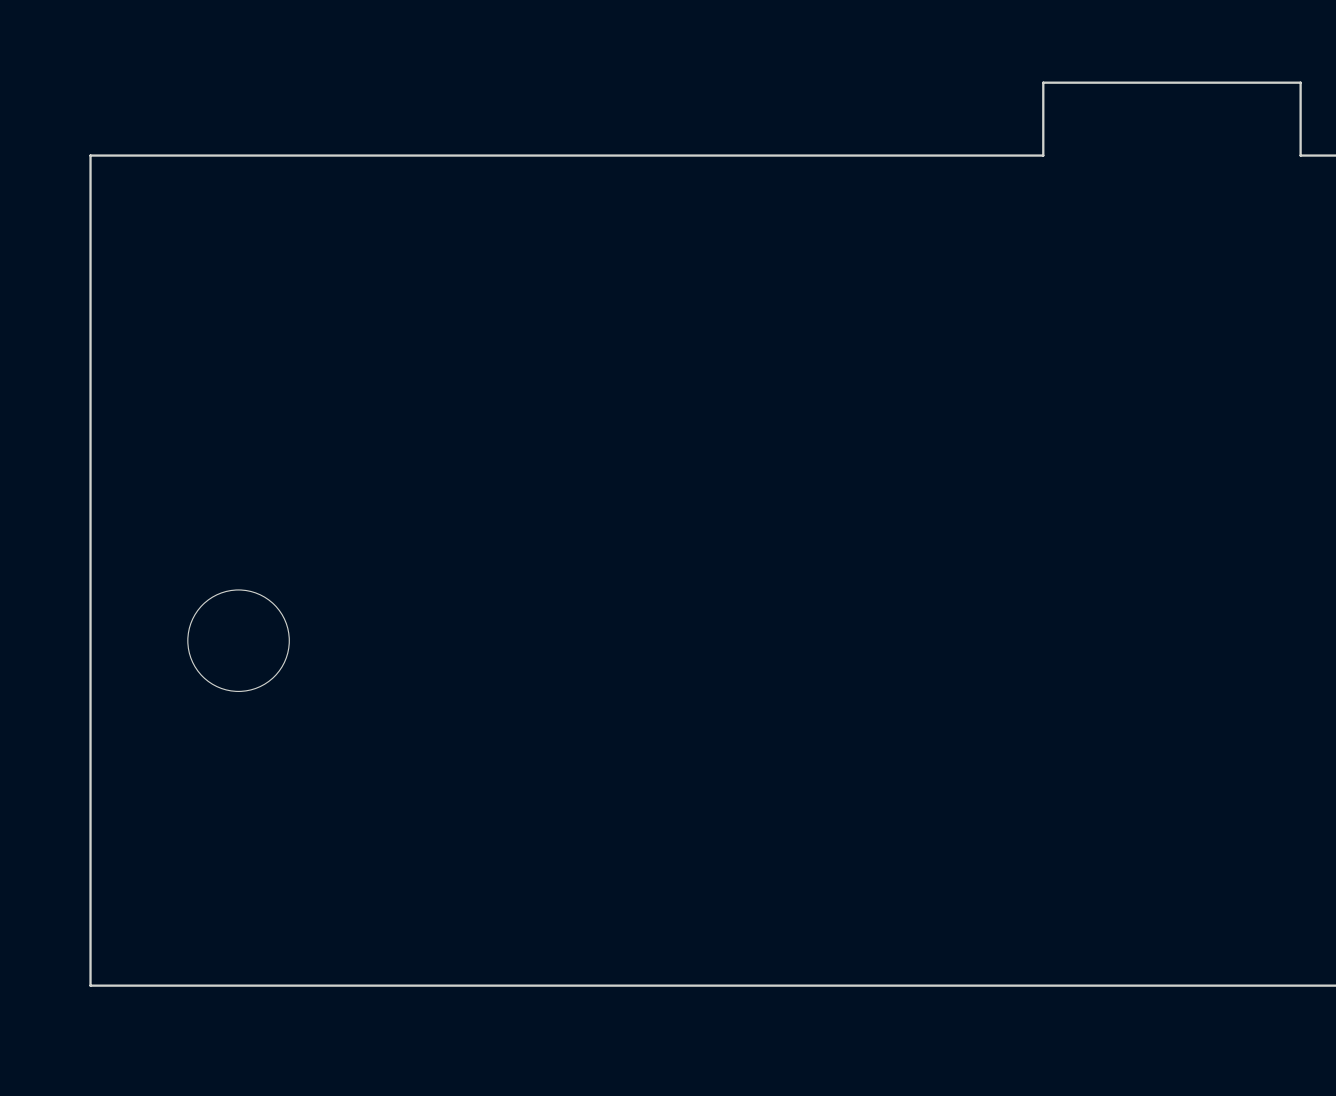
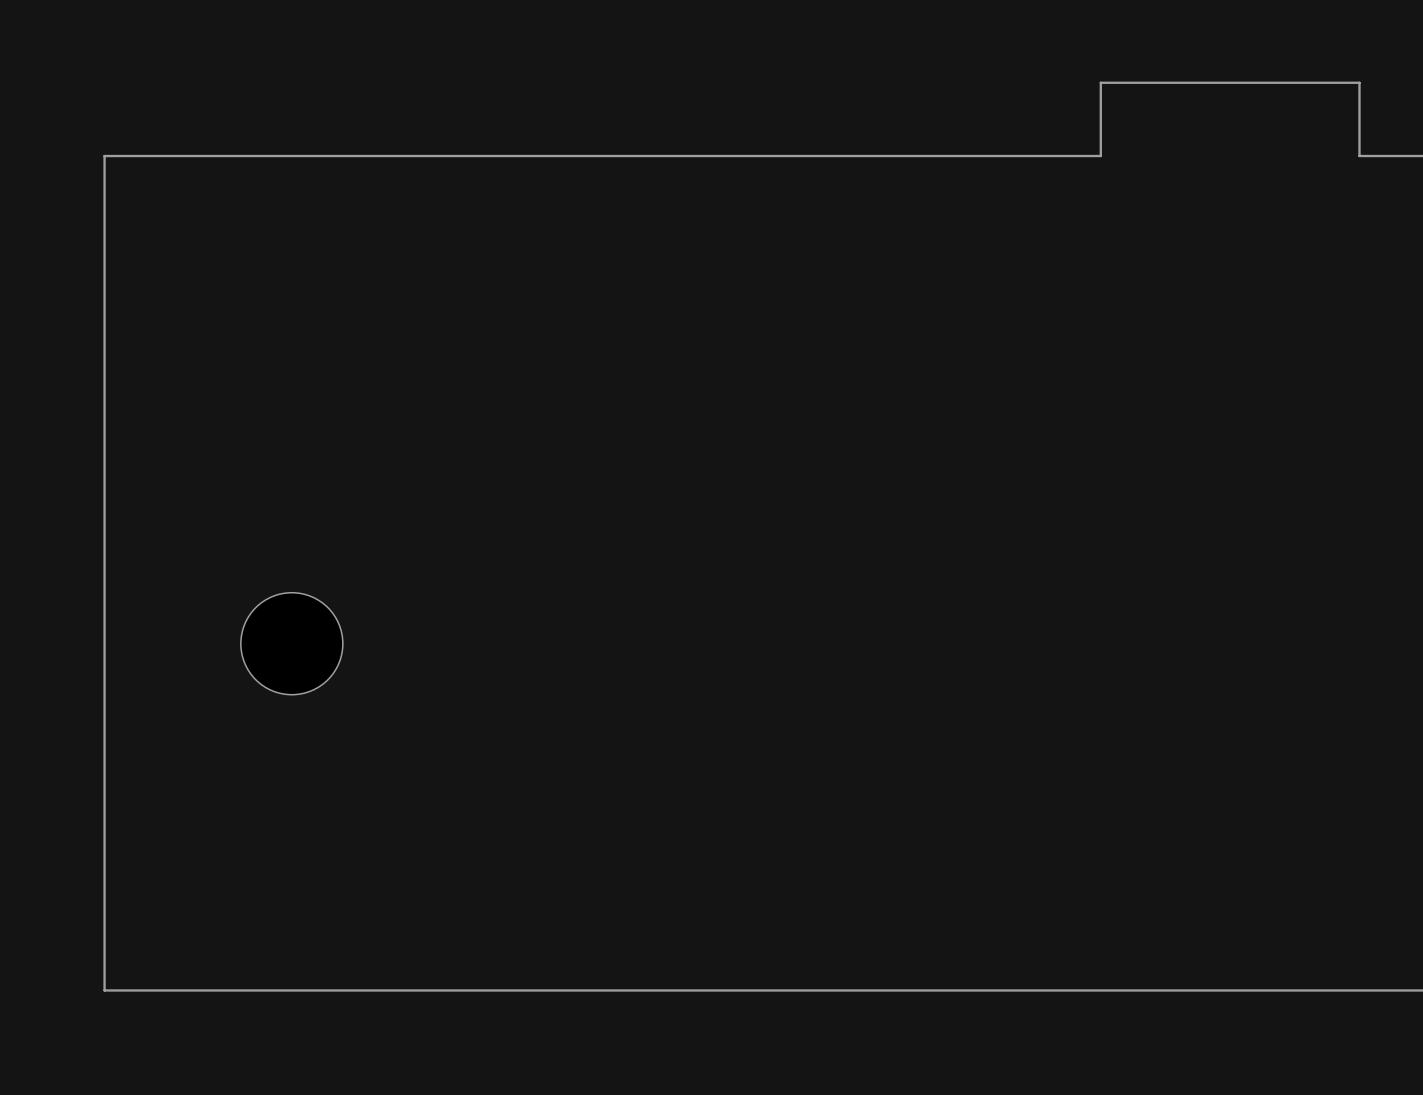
board edge: (90, 155) (90, 985) -> (143, 156) (104, 156) (104, 990) (143, 990)

